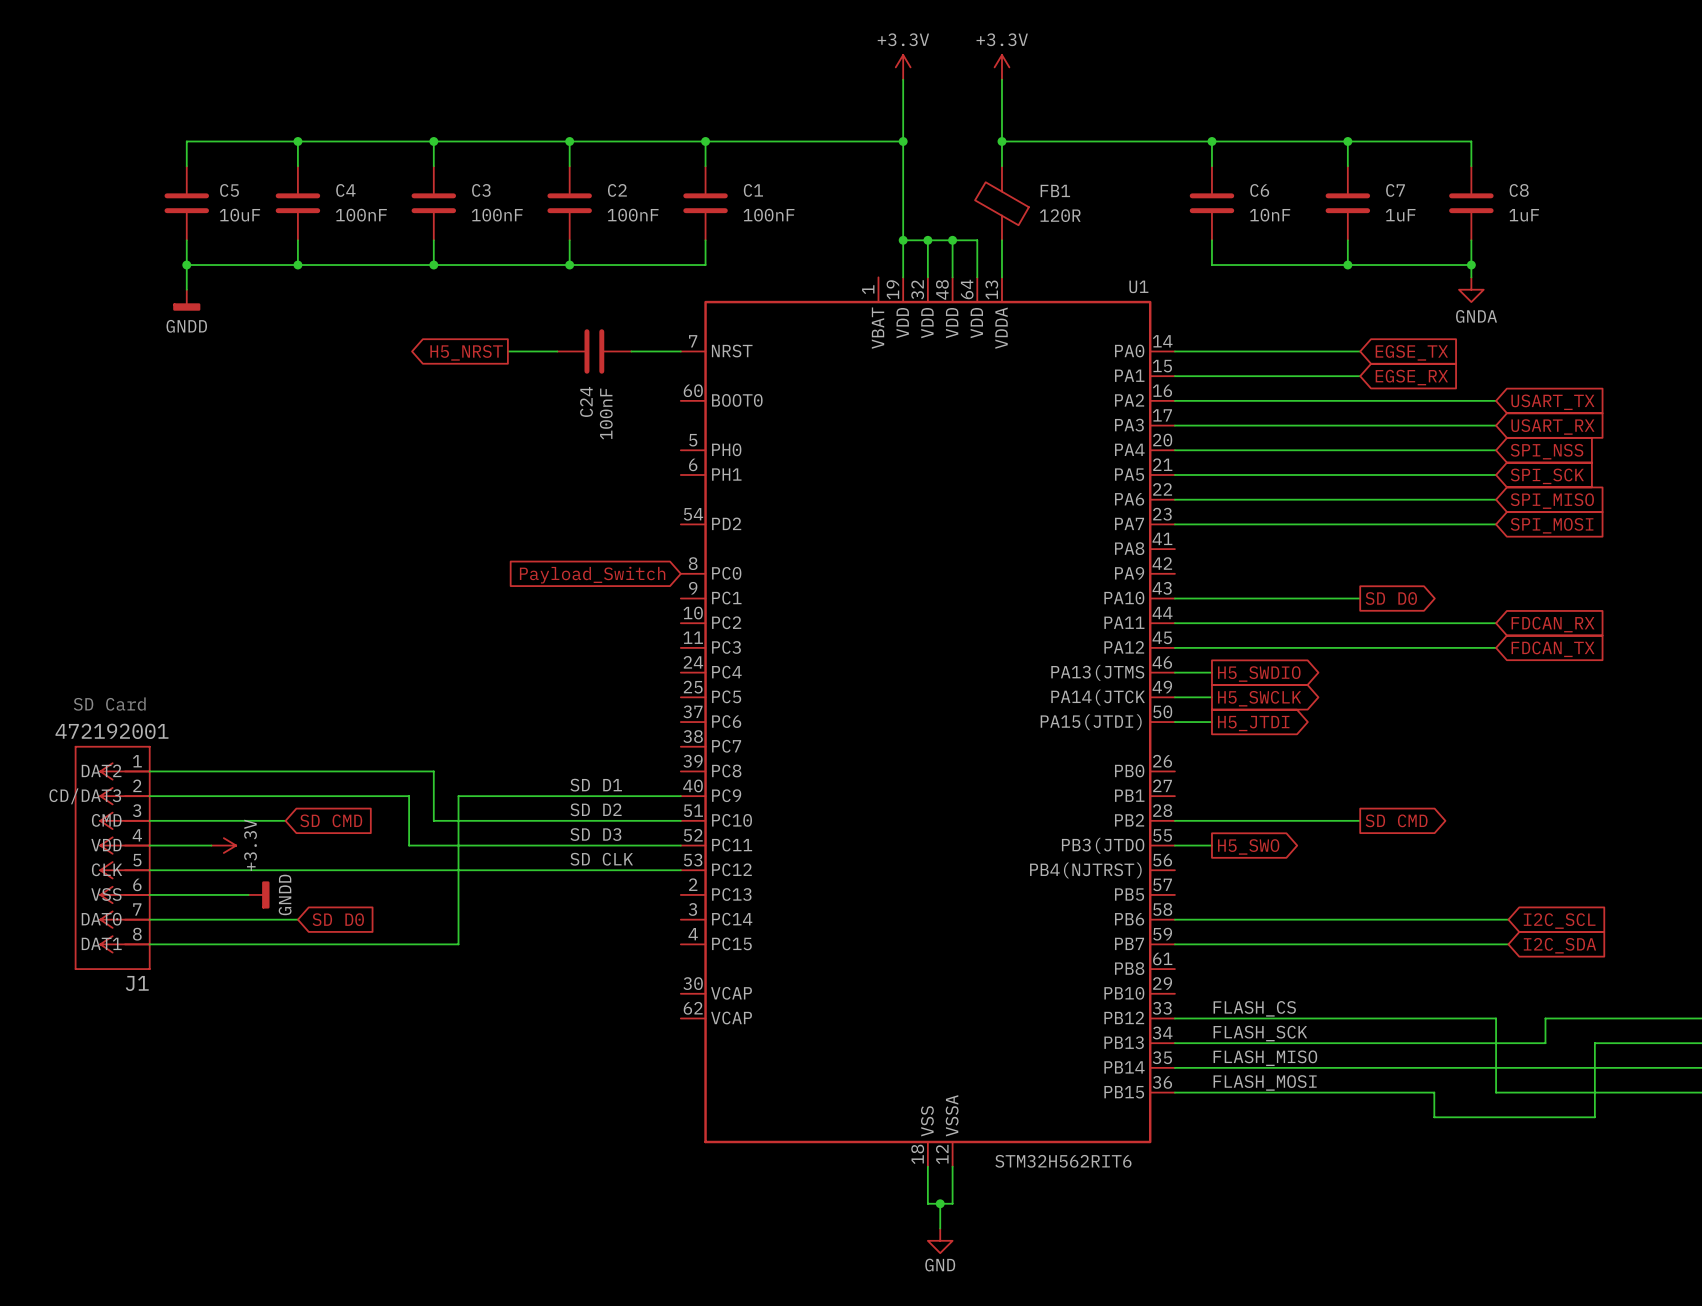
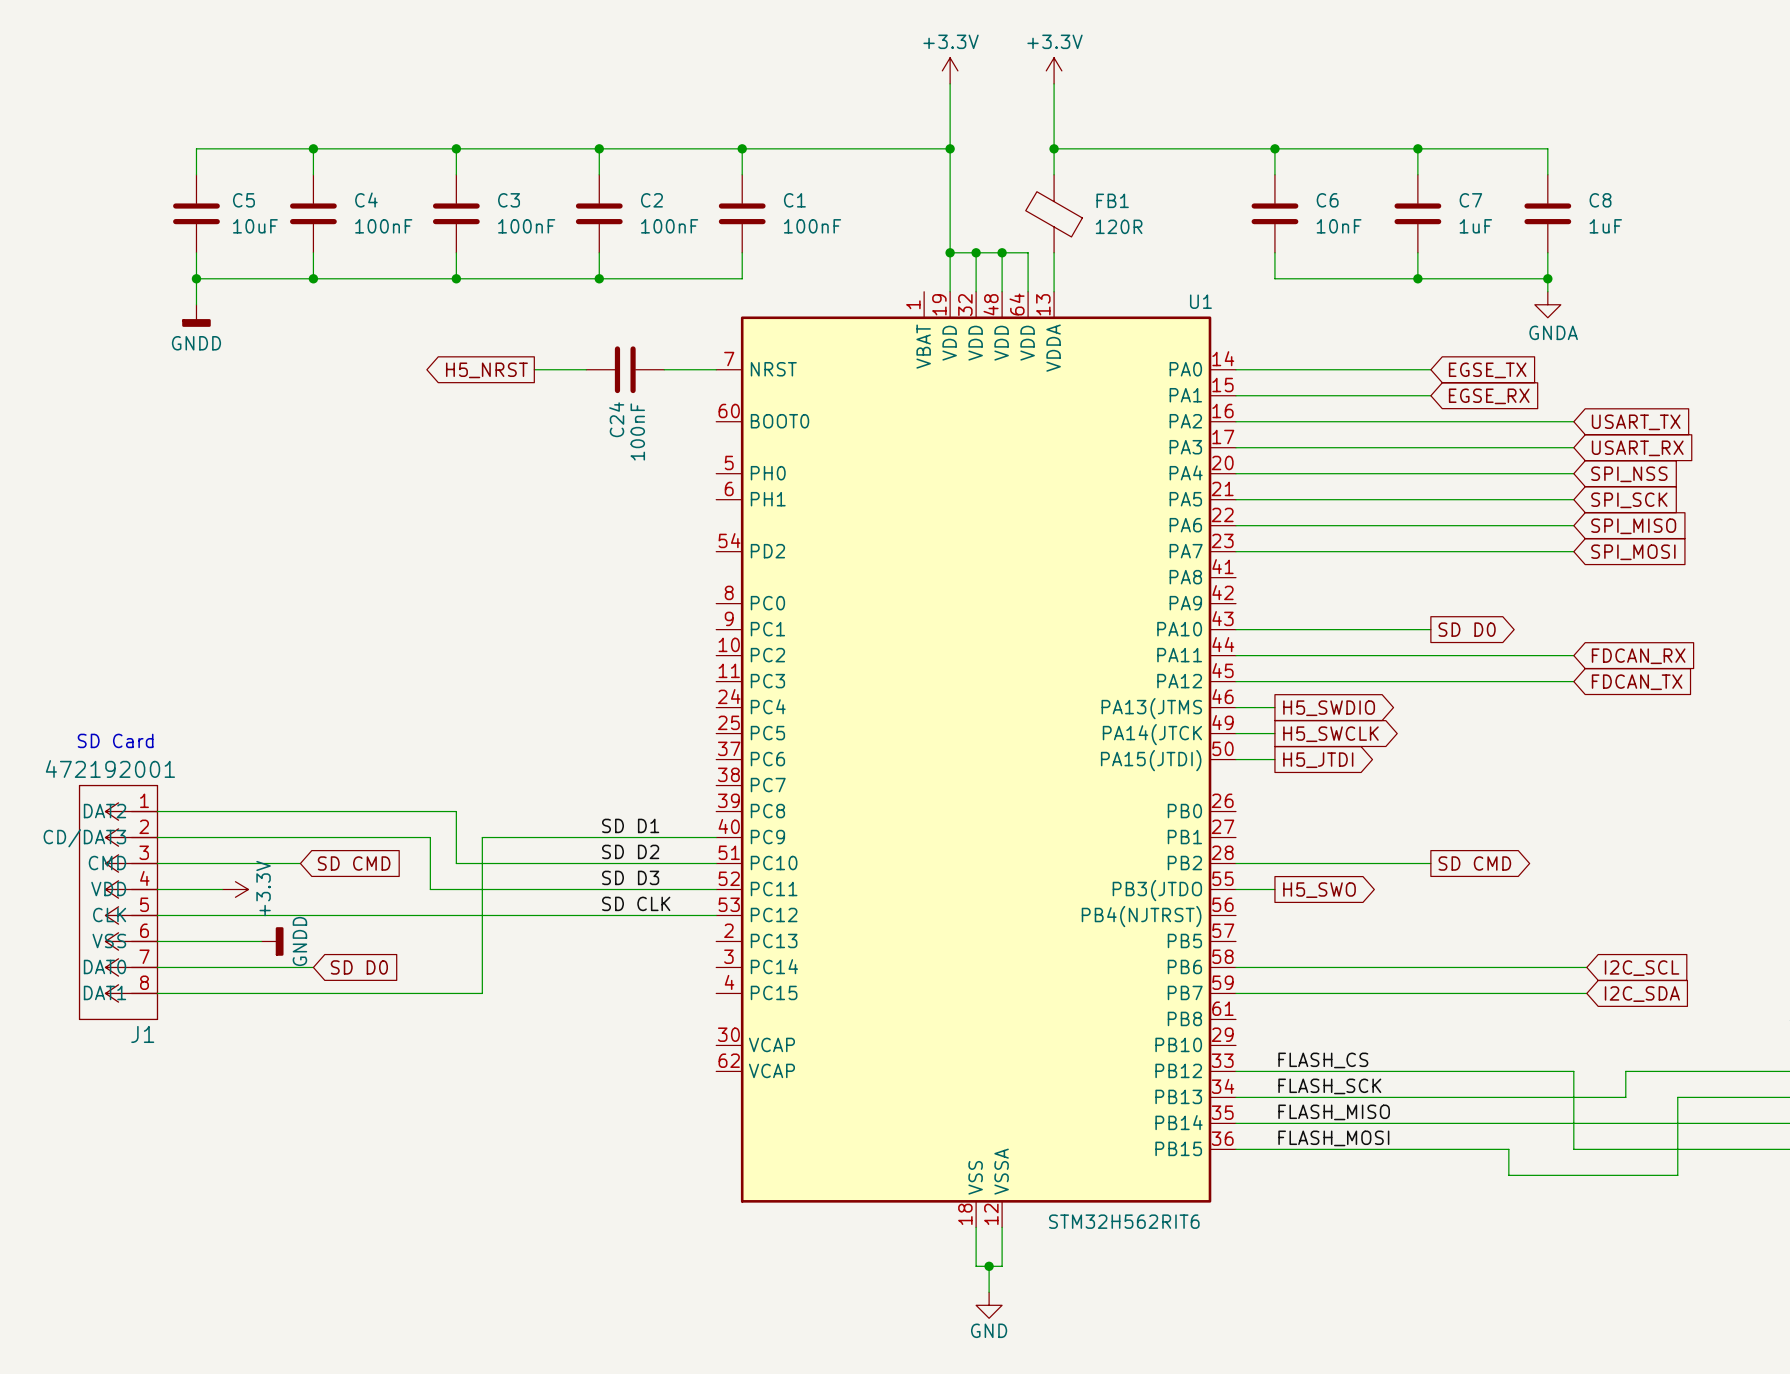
global label: Payload_Switch (592, 575) -> none

